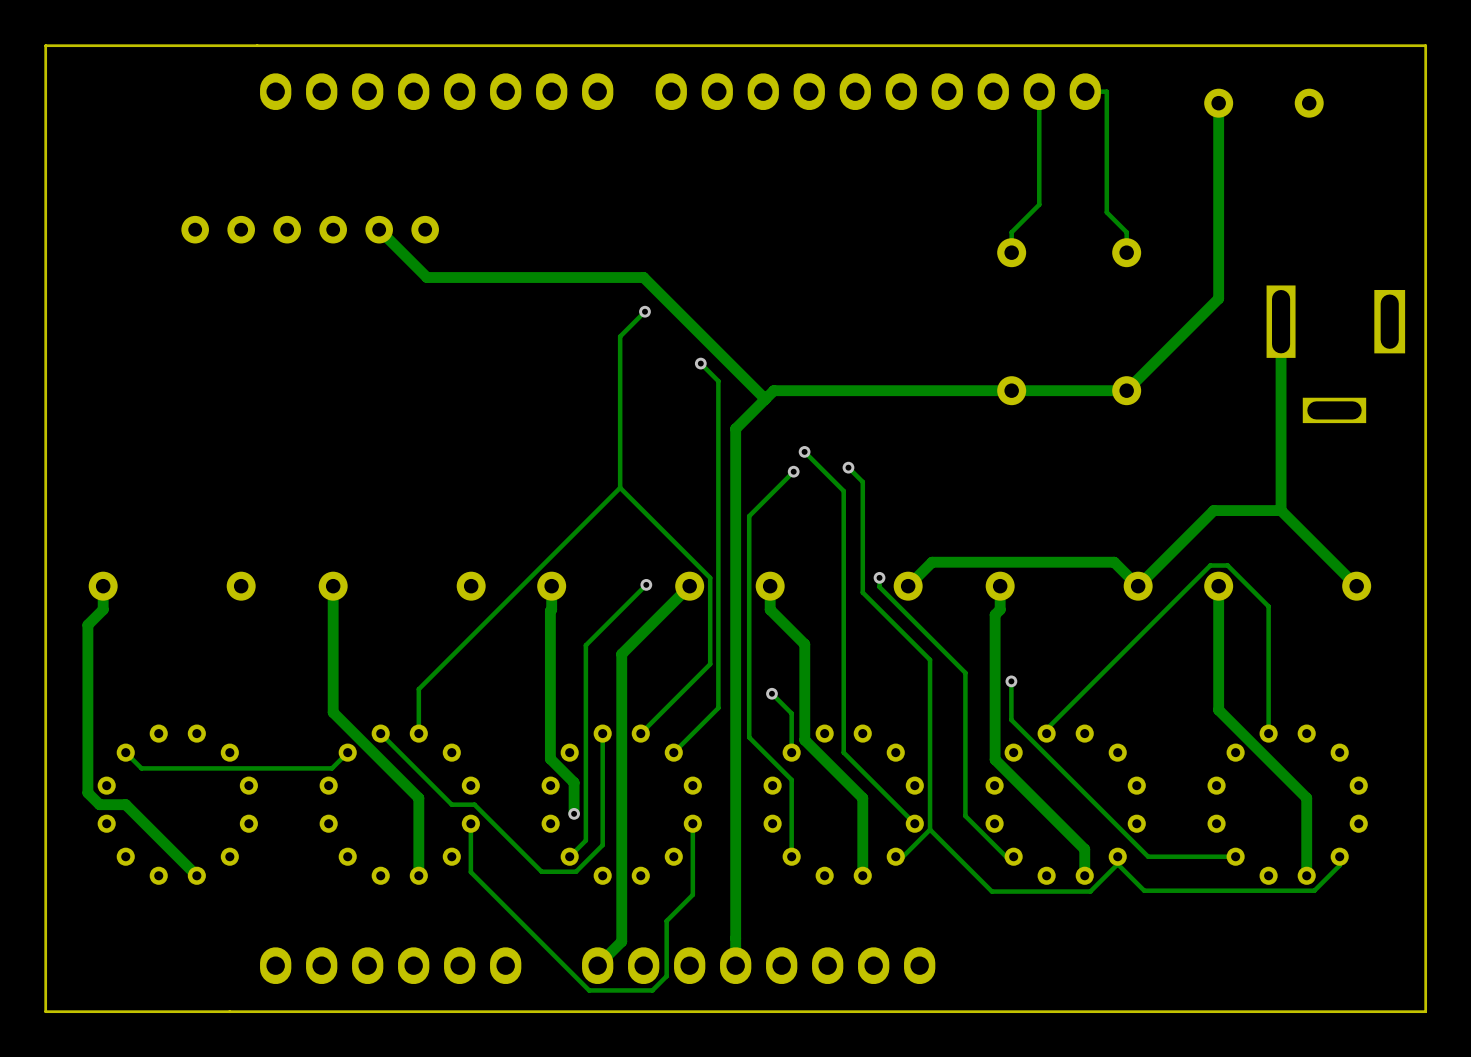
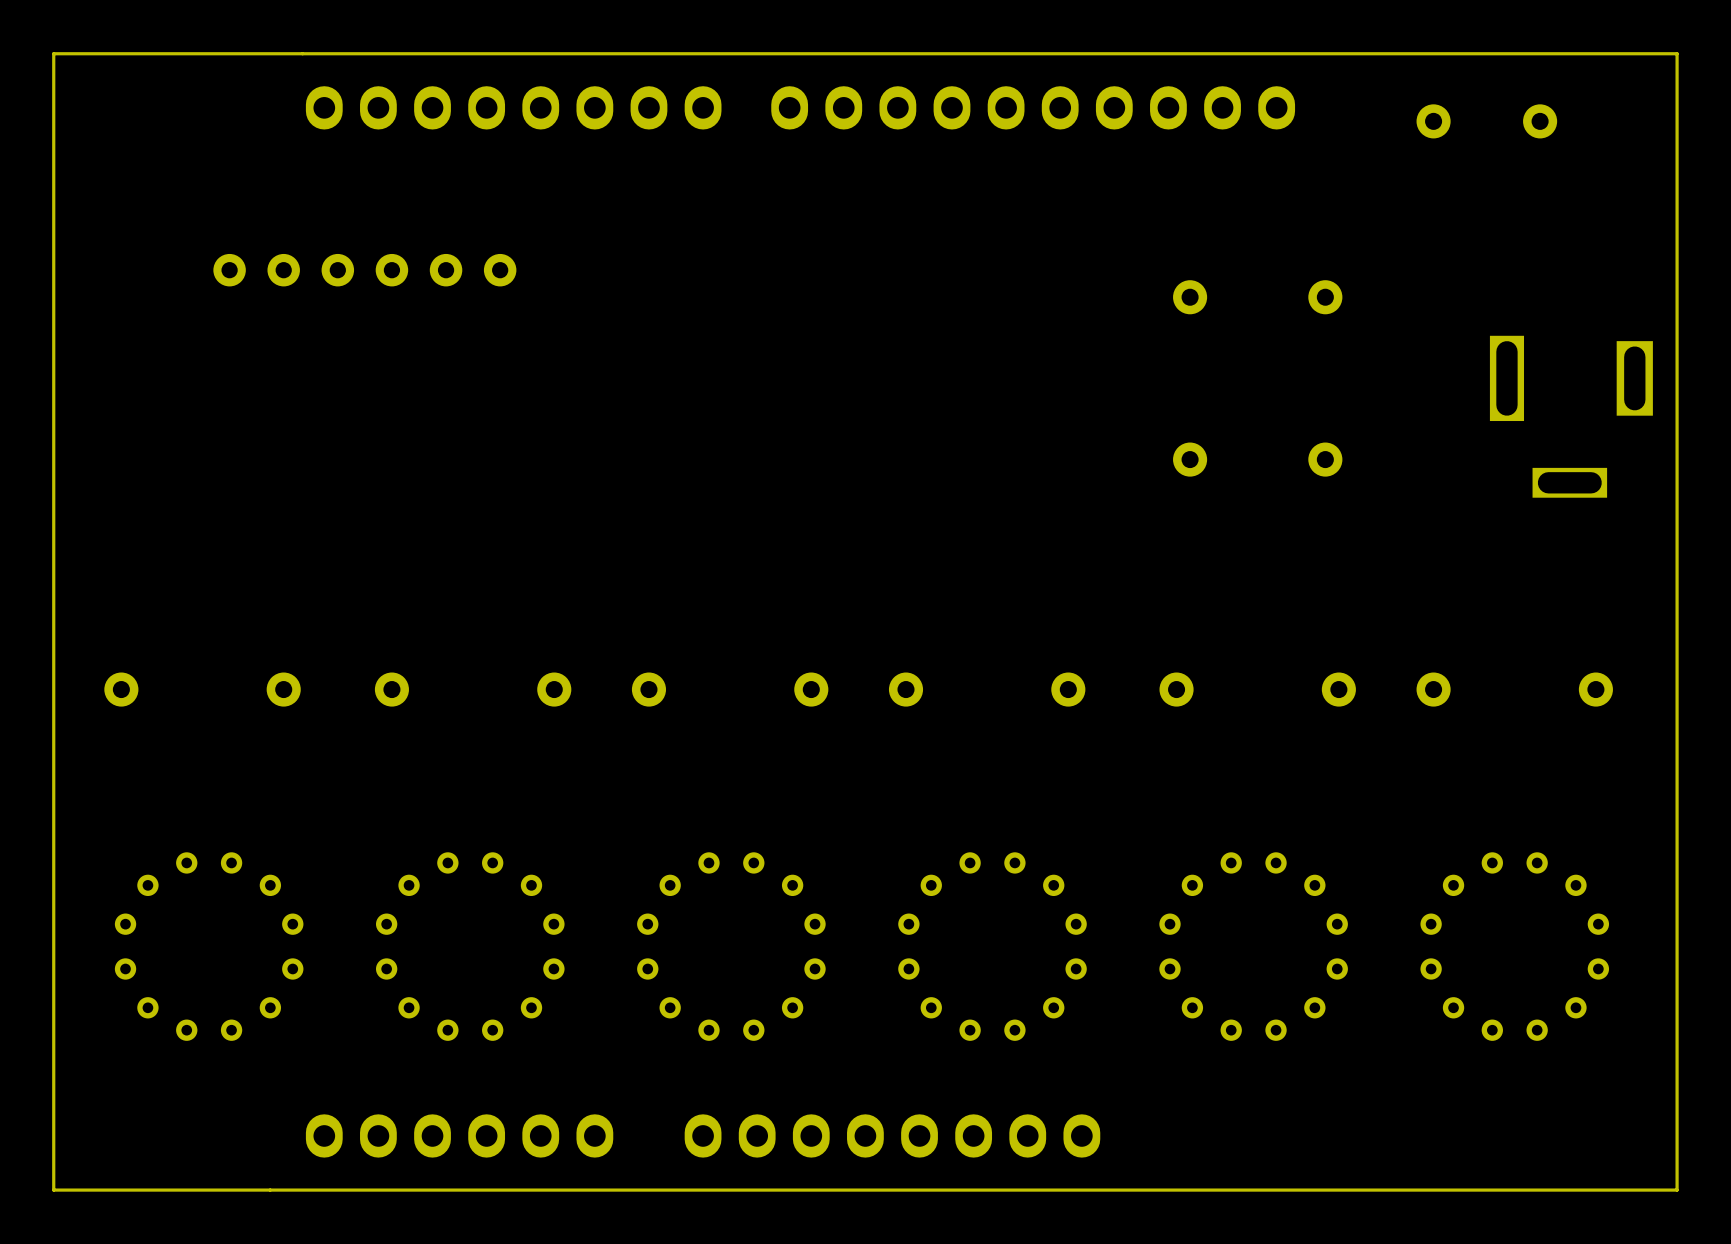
track: (1039, 91) (1039, 204) (1011, 232) (1011, 252) -> none
track: (1085, 91) (1106, 91) (1106, 212) (1126, 232) (1126, 252) -> none
track: (1218, 103) (1218, 298) (1126, 390) (773, 390) (765, 399) -> none
track: (379, 229) (427, 277) (643, 277) (765, 399) -> none
track: (644, 311) (620, 336) (620, 487) -> none
via: (644, 311) -> none
track: (1281, 321) (1281, 510) -> none
track: (700, 363) (718, 381) (718, 708) (673, 752) -> none
via: (700, 363) -> none
track: (765, 399) (735, 428) (735, 965) -> none
track: (804, 451) (843, 491) (843, 752) (914, 823) -> none
via: (804, 451) -> none
track: (848, 467) (862, 481) (862, 592) (930, 659) (930, 829) -> none
via: (848, 467) -> none
track: (793, 471) (749, 516) (749, 737) (791, 779) (791, 856) -> none
via: (793, 471) -> none
track: (620, 487) (418, 689) (418, 733) -> none
track: (620, 487) (710, 577) (710, 664) (640, 733) -> none
track: (1281, 510) (1356, 586) -> none
track: (1281, 510) (1213, 510) (1138, 586) (1114, 562) (932, 562) (908, 586) -> none
track: (879, 577) (879, 587) (965, 672) (965, 816) (1006, 856) (1013, 856) -> none
via: (879, 577) -> none
track: (646, 584) (585, 645) (585, 840) (569, 856) -> none
via: (646, 584) -> none
track: (103, 586) (103, 609) (87, 625) (87, 792) (99, 804) (125, 804) (196, 875) -> none
track: (333, 586) (333, 712) (418, 798) (418, 875) -> none
track: (551, 586) (550, 758) (574, 782) (574, 813) -> none
track: (689, 586) (621, 654) (621, 941) (597, 965) -> none
track: (770, 586) (770, 609) (804, 644) (804, 740) (862, 798) (862, 875) -> none
track: (1000, 586) (1000, 609) (995, 614) (995, 759) (1084, 849) (1084, 875) -> none
track: (1218, 586) (1218, 710) (1306, 798) (1306, 875) -> none
track: (1011, 681) (1011, 719) (1148, 856) (1235, 856) -> none
via: (1011, 681) -> none
track: (771, 693) (791, 713) (791, 752) -> none
via: (771, 693) -> none
track: (602, 733) (602, 845) (576, 871) (541, 871) (474, 804) (451, 804) (380, 733) -> none
track: (1268, 733) (1268, 606) (1227, 565) (1210, 565) (1046, 729) (1046, 733) -> none
track: (347, 752) (331, 768) (141, 768) (125, 752) -> none
via: (574, 813) -> none
track: (692, 823) (692, 894) (666, 921) (666, 976) (652, 990) (589, 990) (470, 872) (470, 823) -> none
track: (930, 829) (991, 891) (1090, 891) (1117, 864) -> none
track: (930, 829) (902, 856) (895, 856) -> none
track: (1339, 856) (1339, 865) (1314, 890) (1144, 890) (1117, 864) -> none

